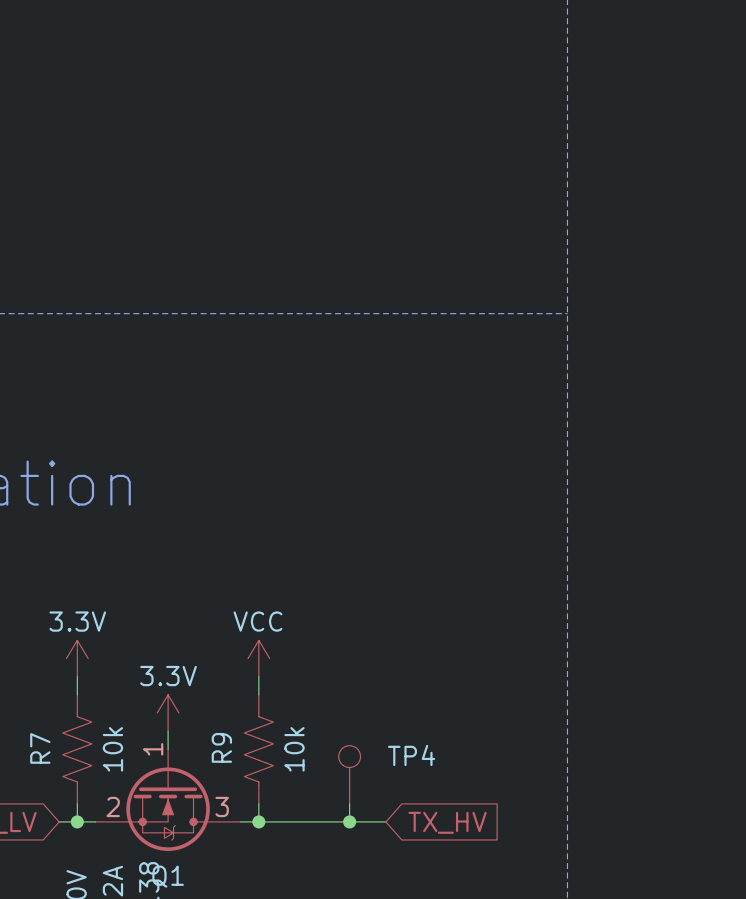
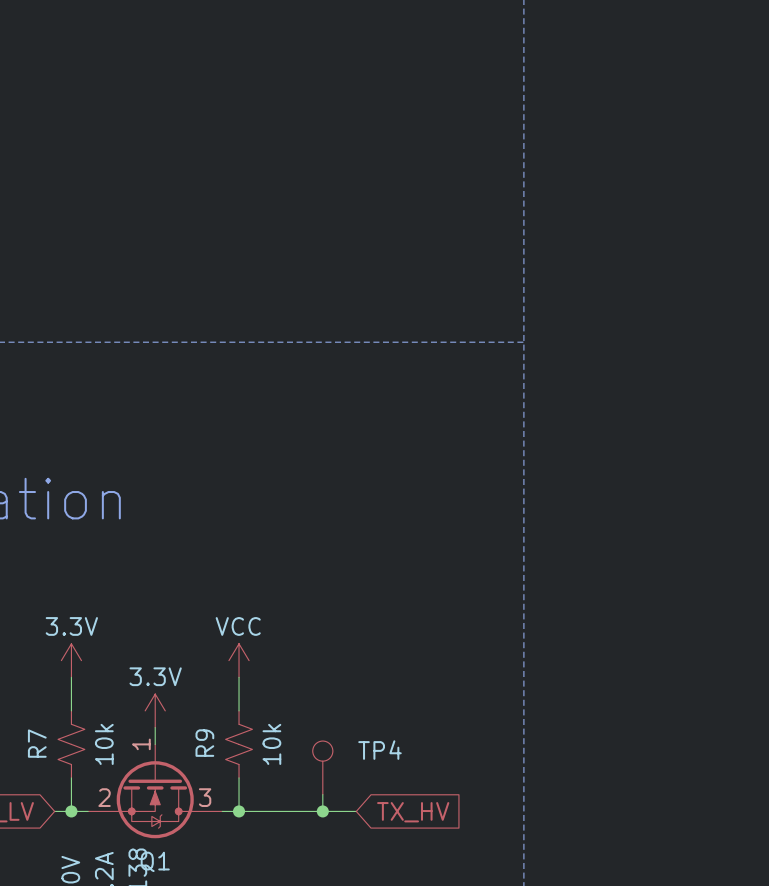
R7 symbol: [62, 694, 92, 804] -> [58, 710, 85, 778]
R9 symbol: [244, 694, 274, 804] -> [225, 710, 253, 778]

